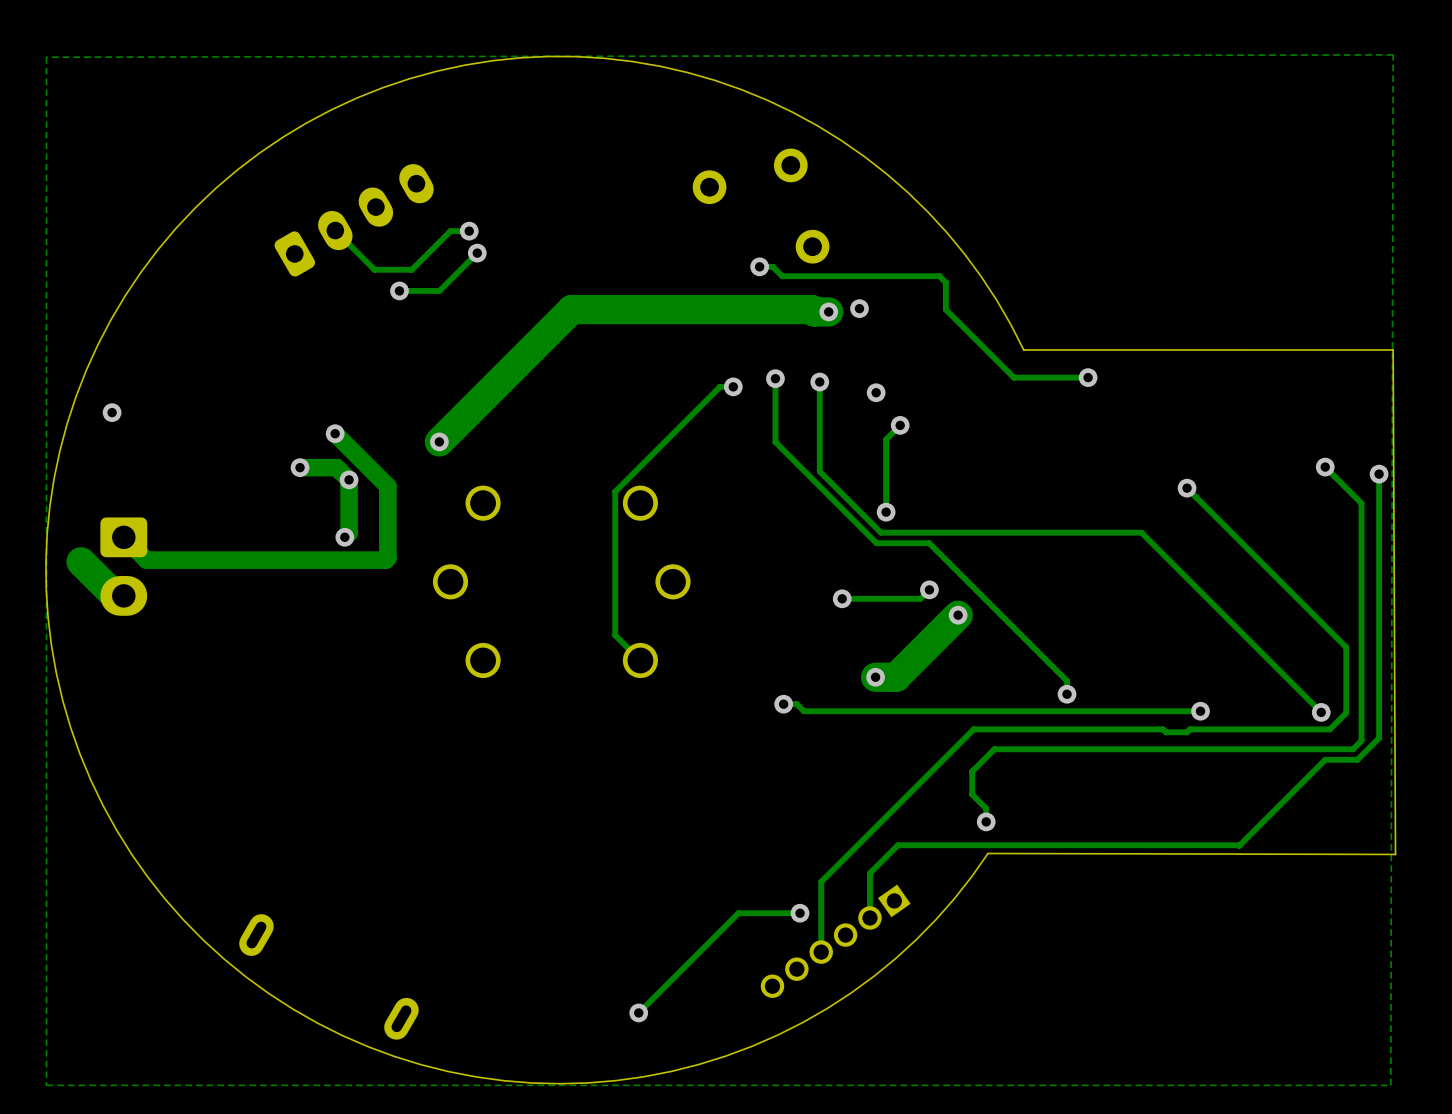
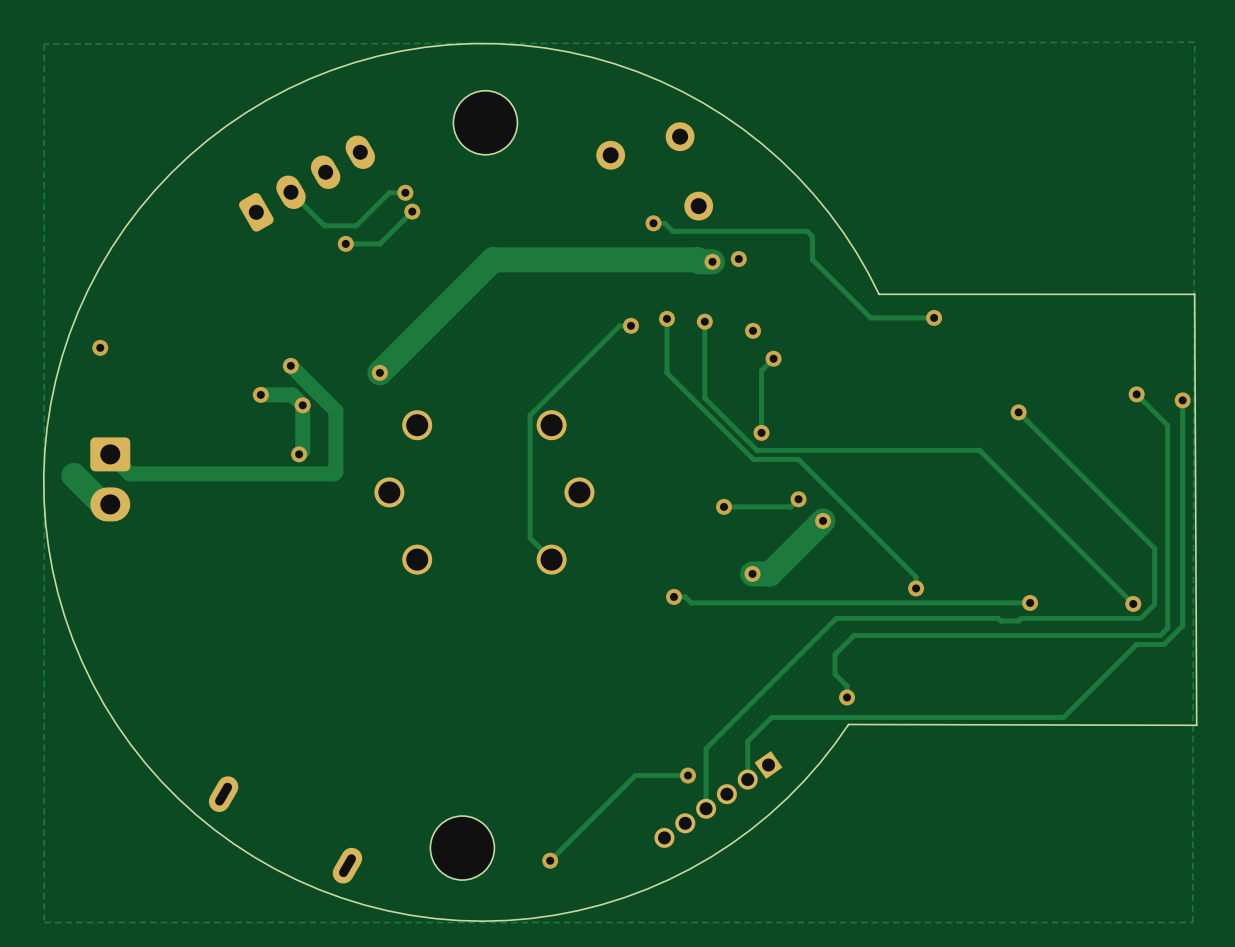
part: none -> (485, 122)
part: none -> (462, 848)

